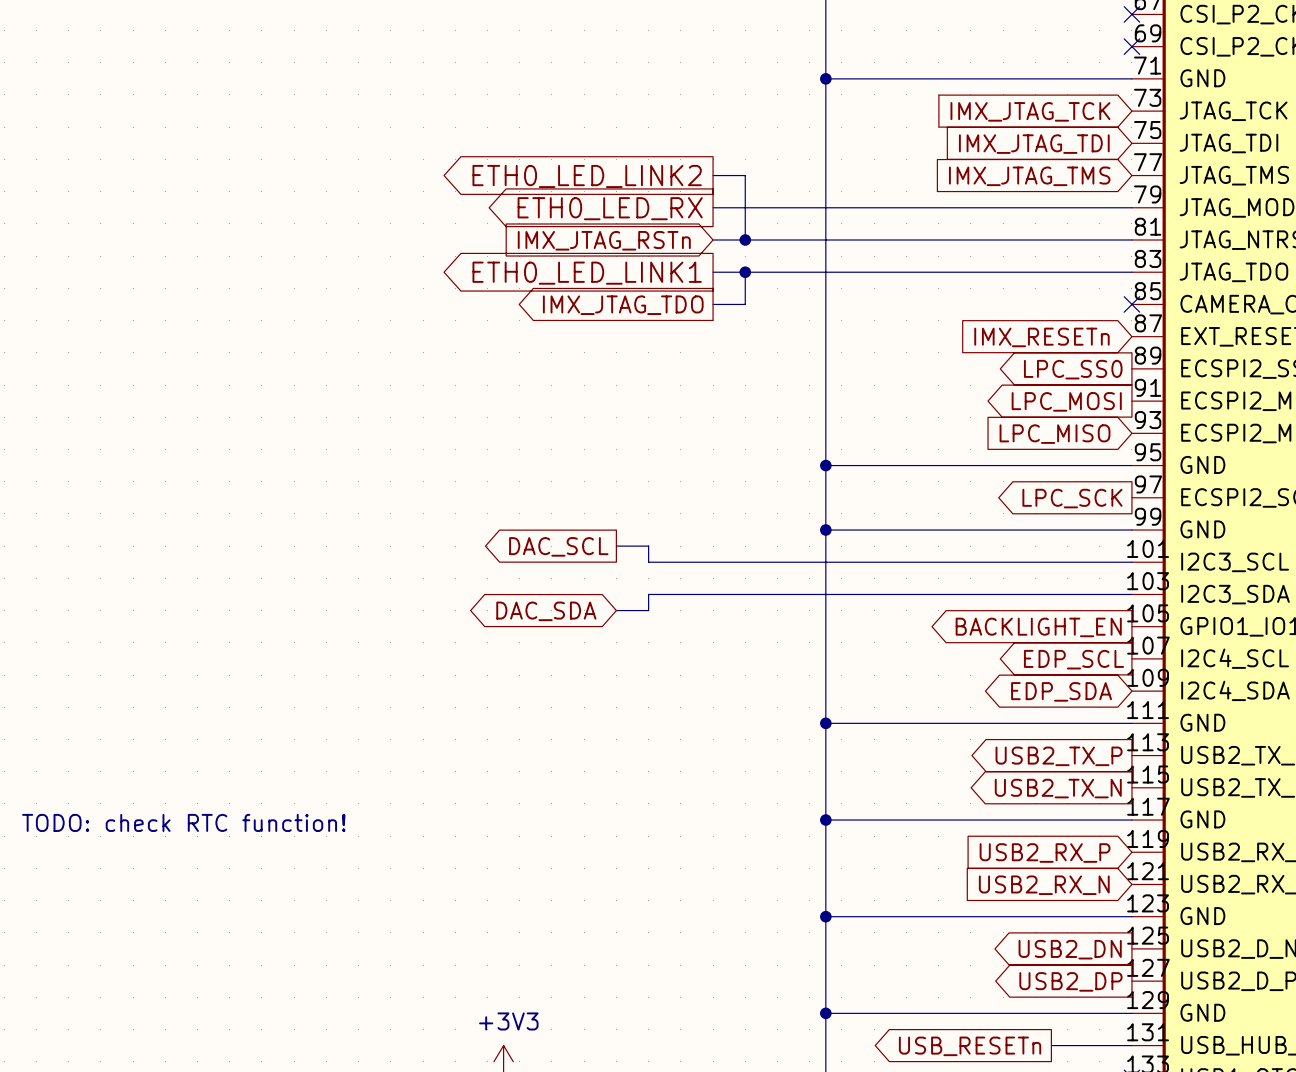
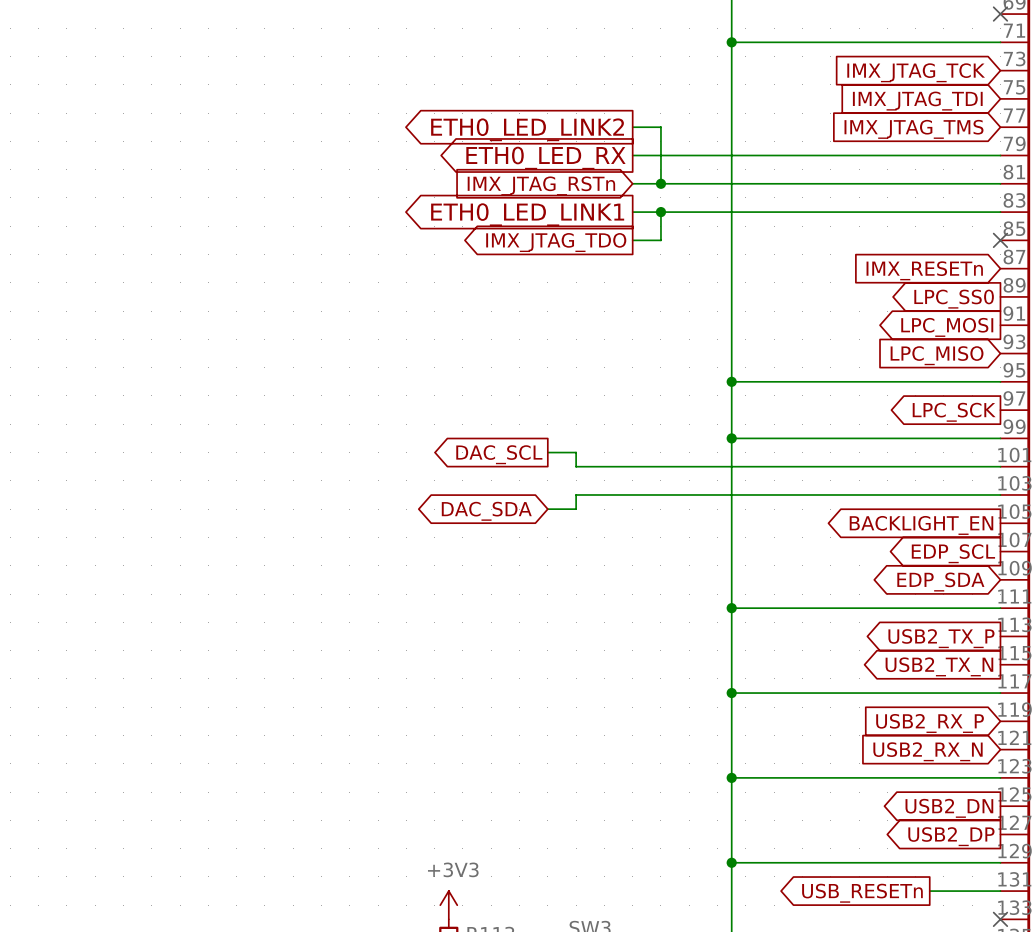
text: TODO: check RTC function! (183, 822) -> none

